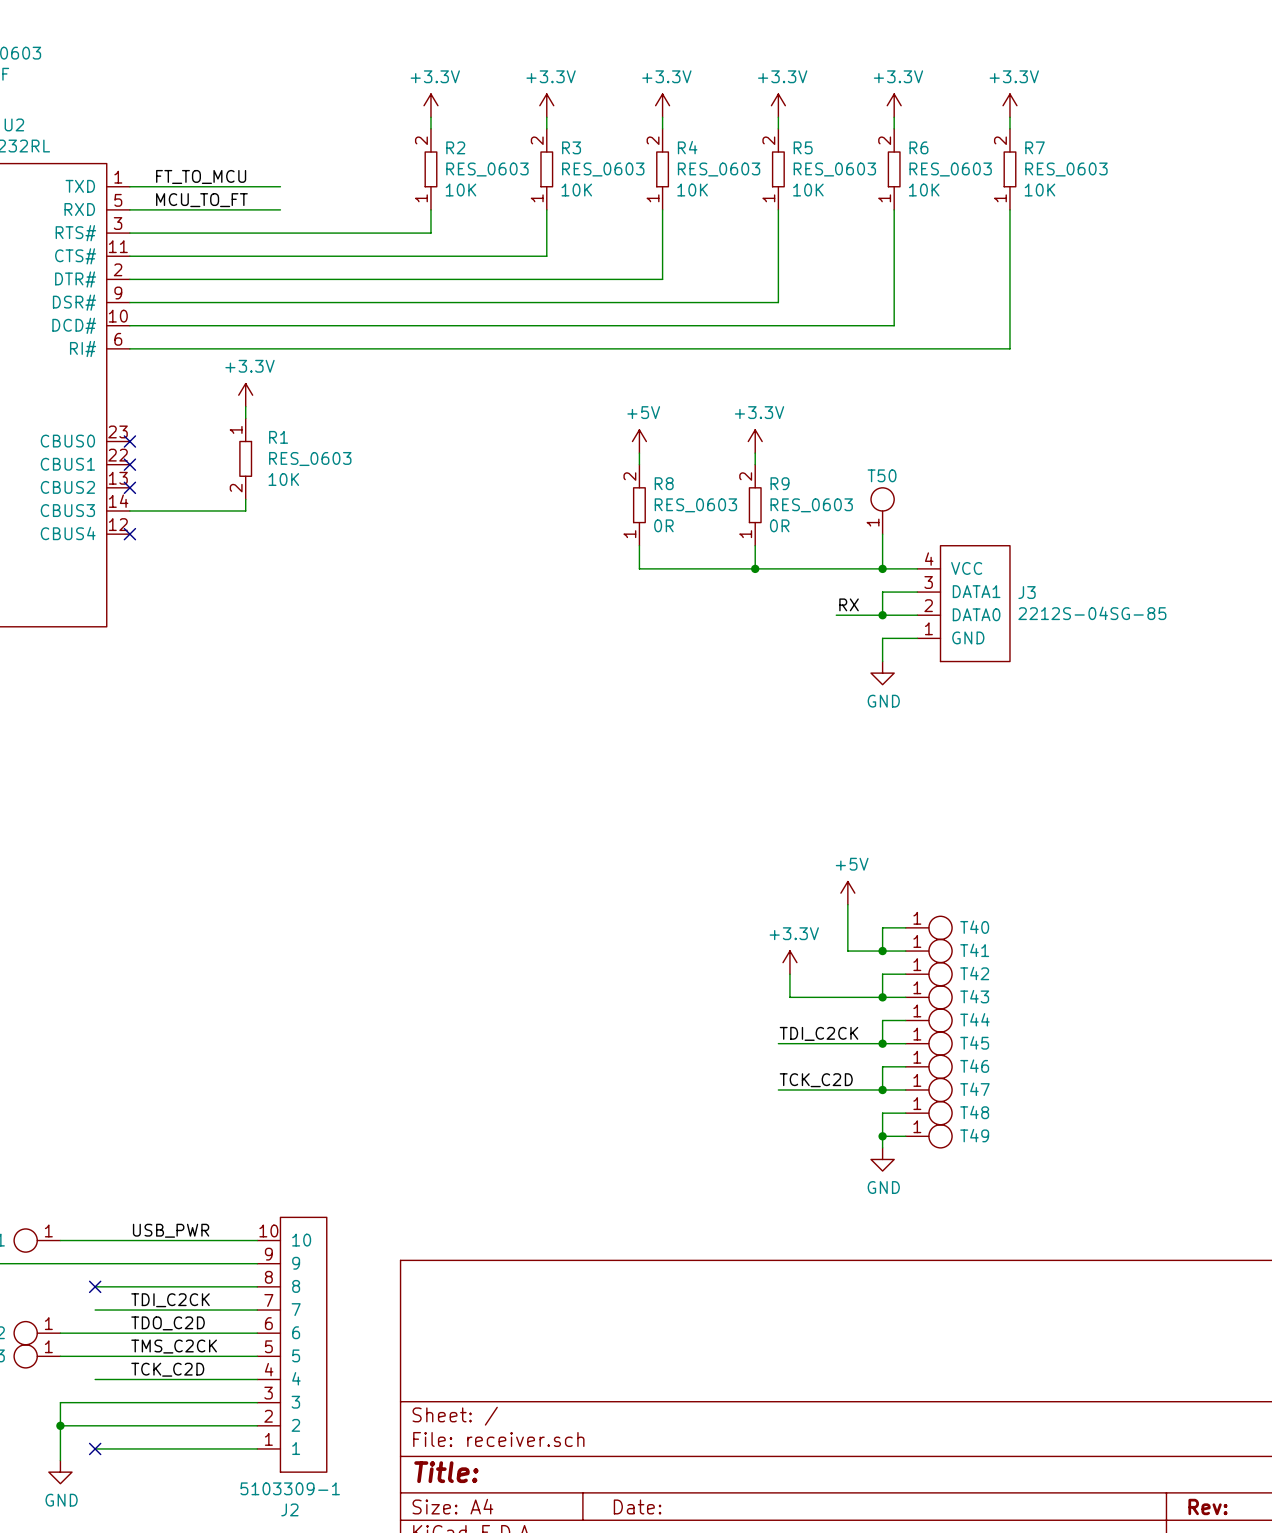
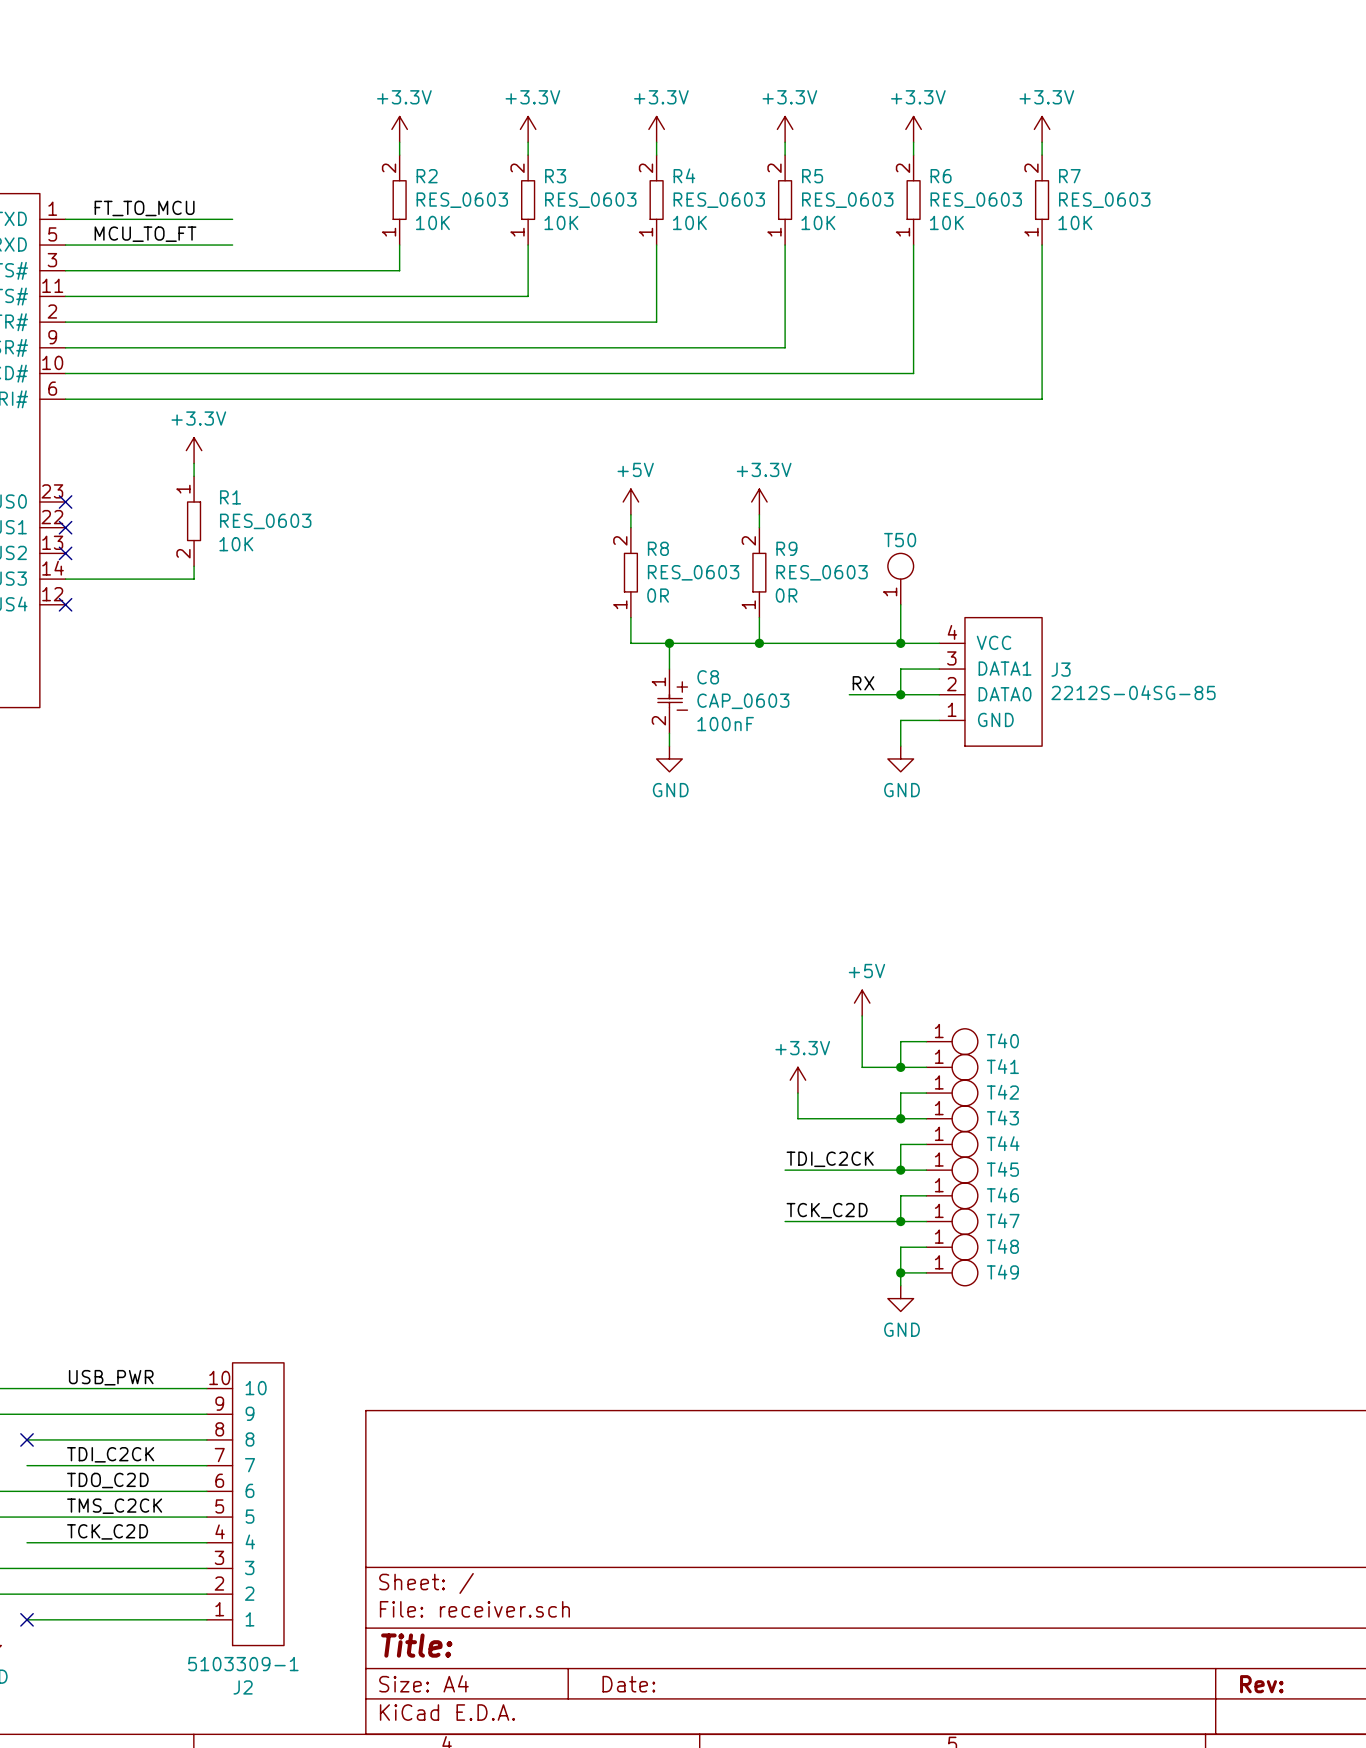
wire: none -> (669, 643) (669, 669)
junction: none -> (669, 643)
C8: none -> CAP_0603 (672, 701)
wire: none -> (669, 733) (669, 746)
power symbol: none -> GND (669, 758)

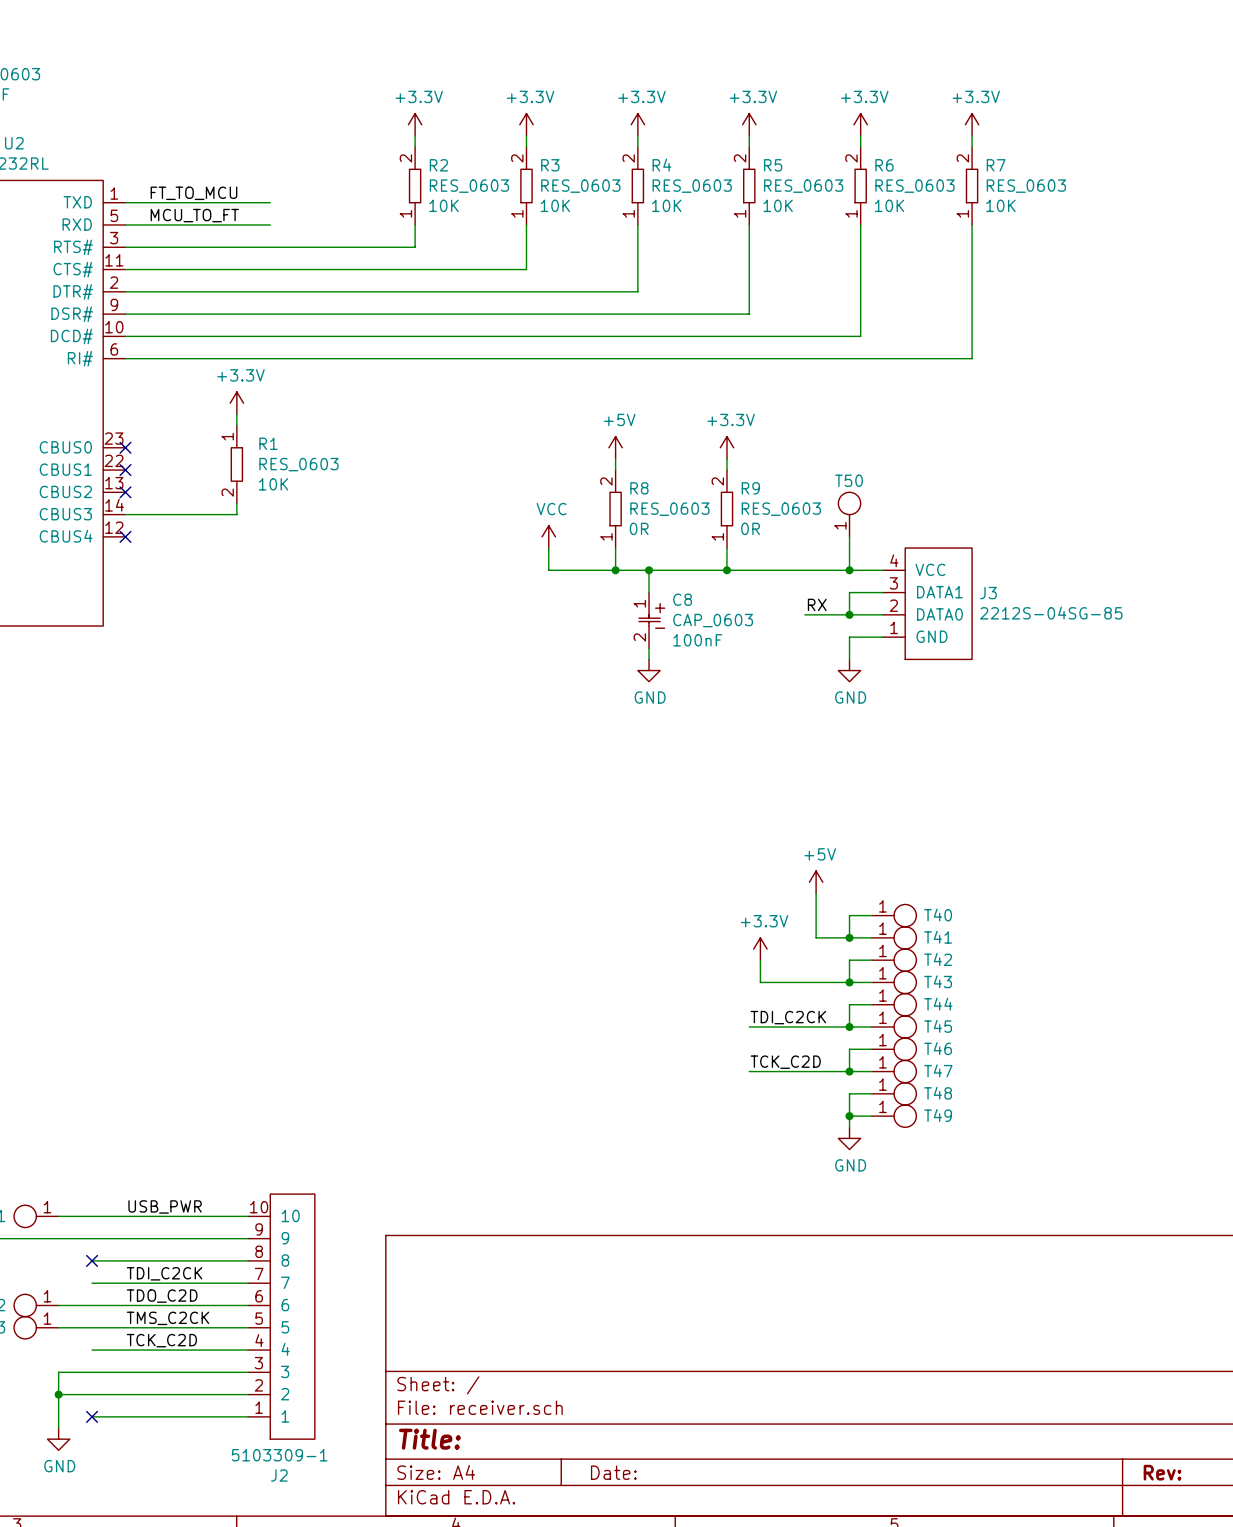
power symbol: none -> VCC (548, 536)
wire: none -> (548, 548) (548, 570) (615, 570)
junction: none -> (615, 570)

